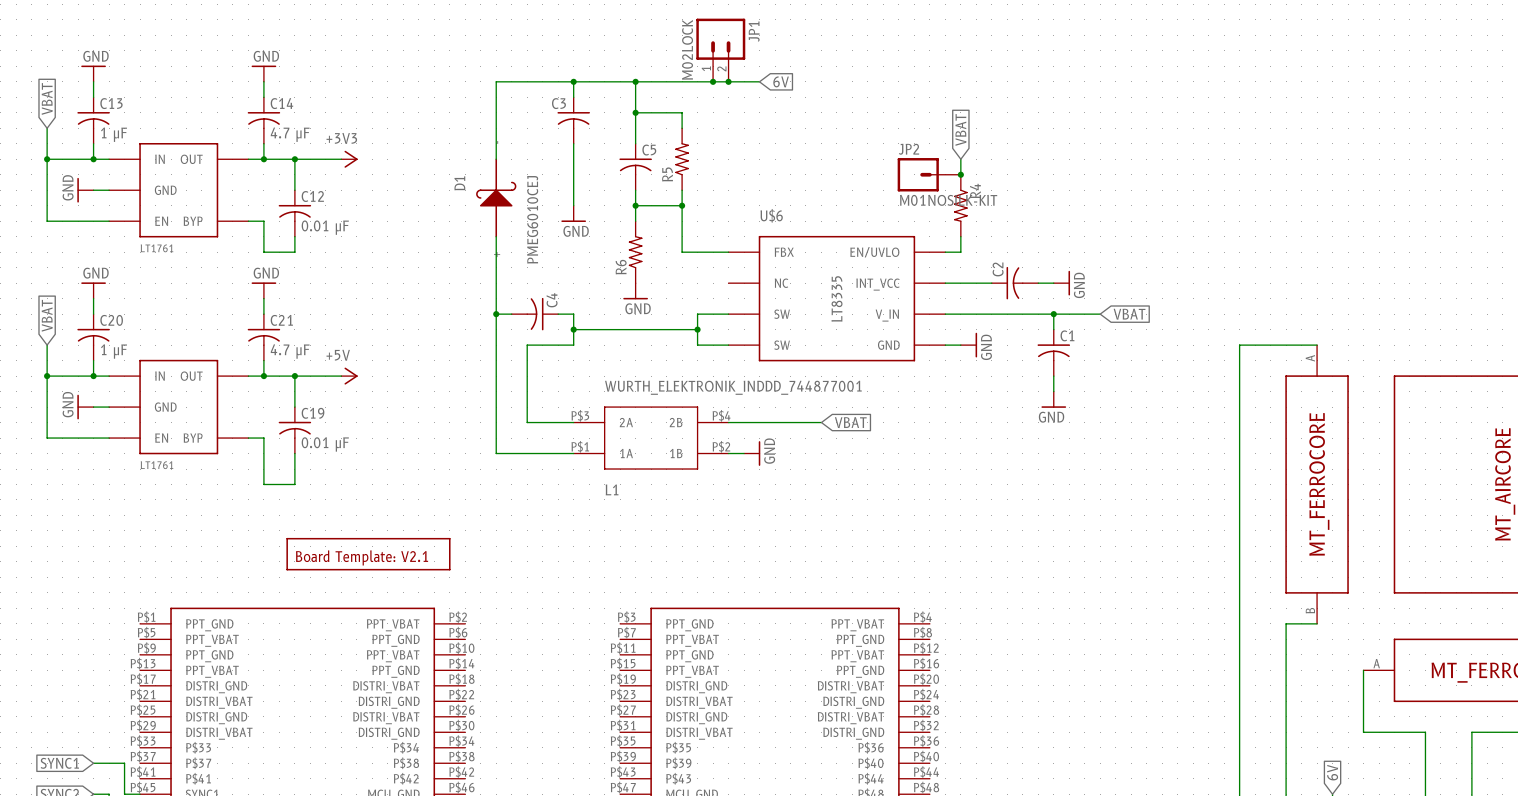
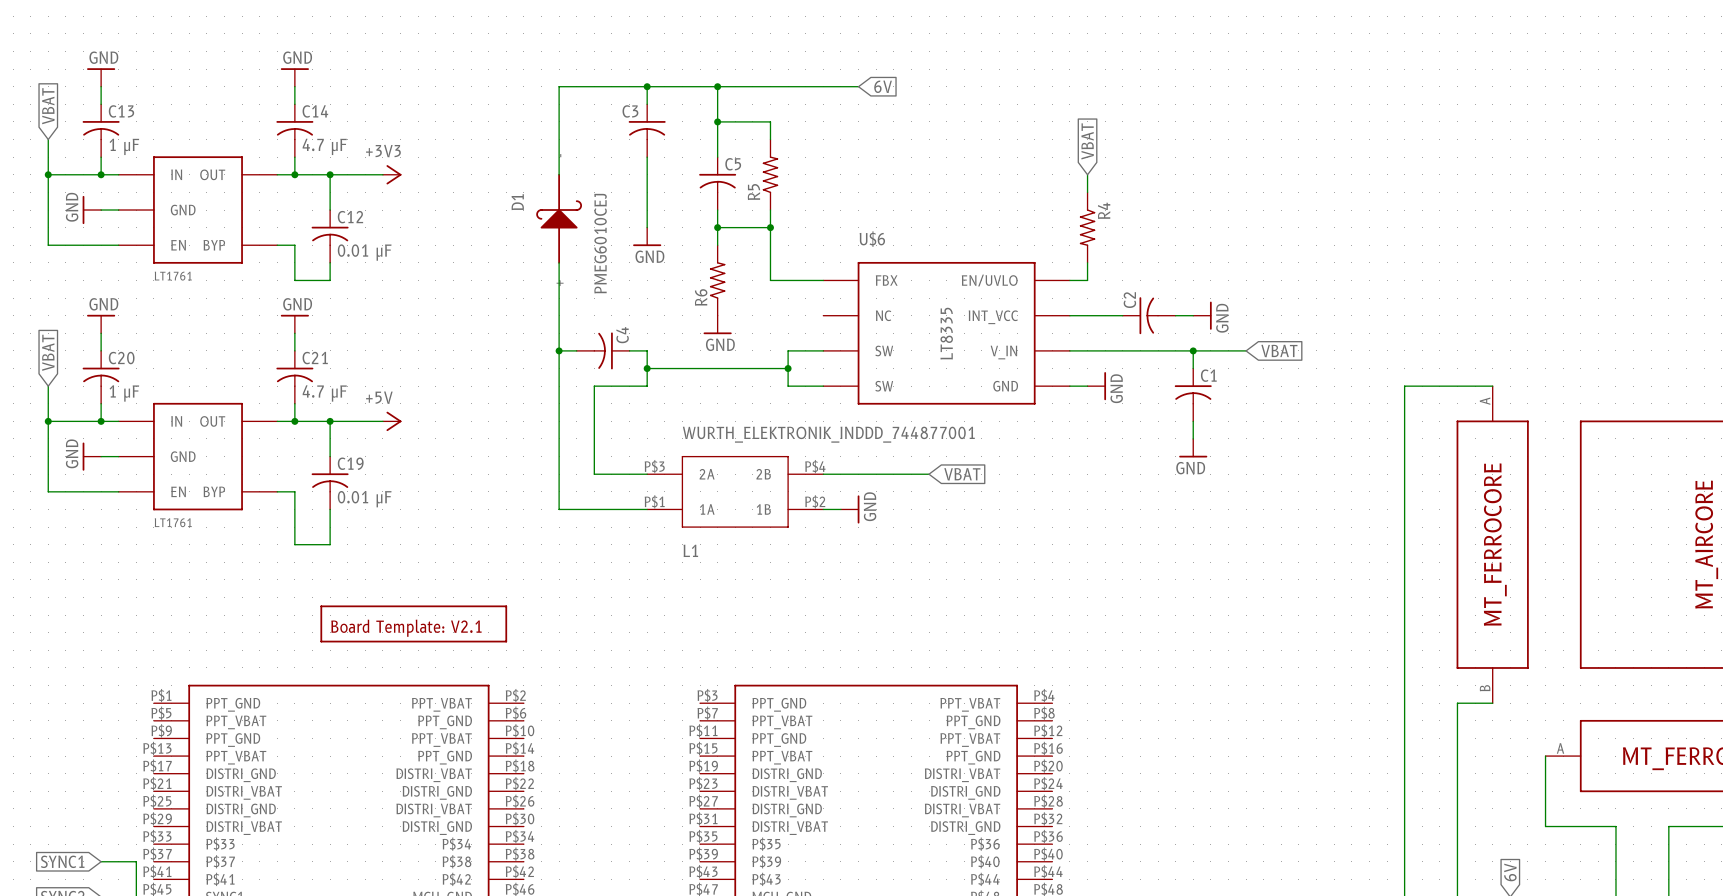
JP1: M02LOCK (720, 50) -> none
junction: (713, 81) -> none
junction: (728, 81) -> none
JP2: M01NOSILK-KIT (929, 174) -> none
junction: (960, 174) -> none

